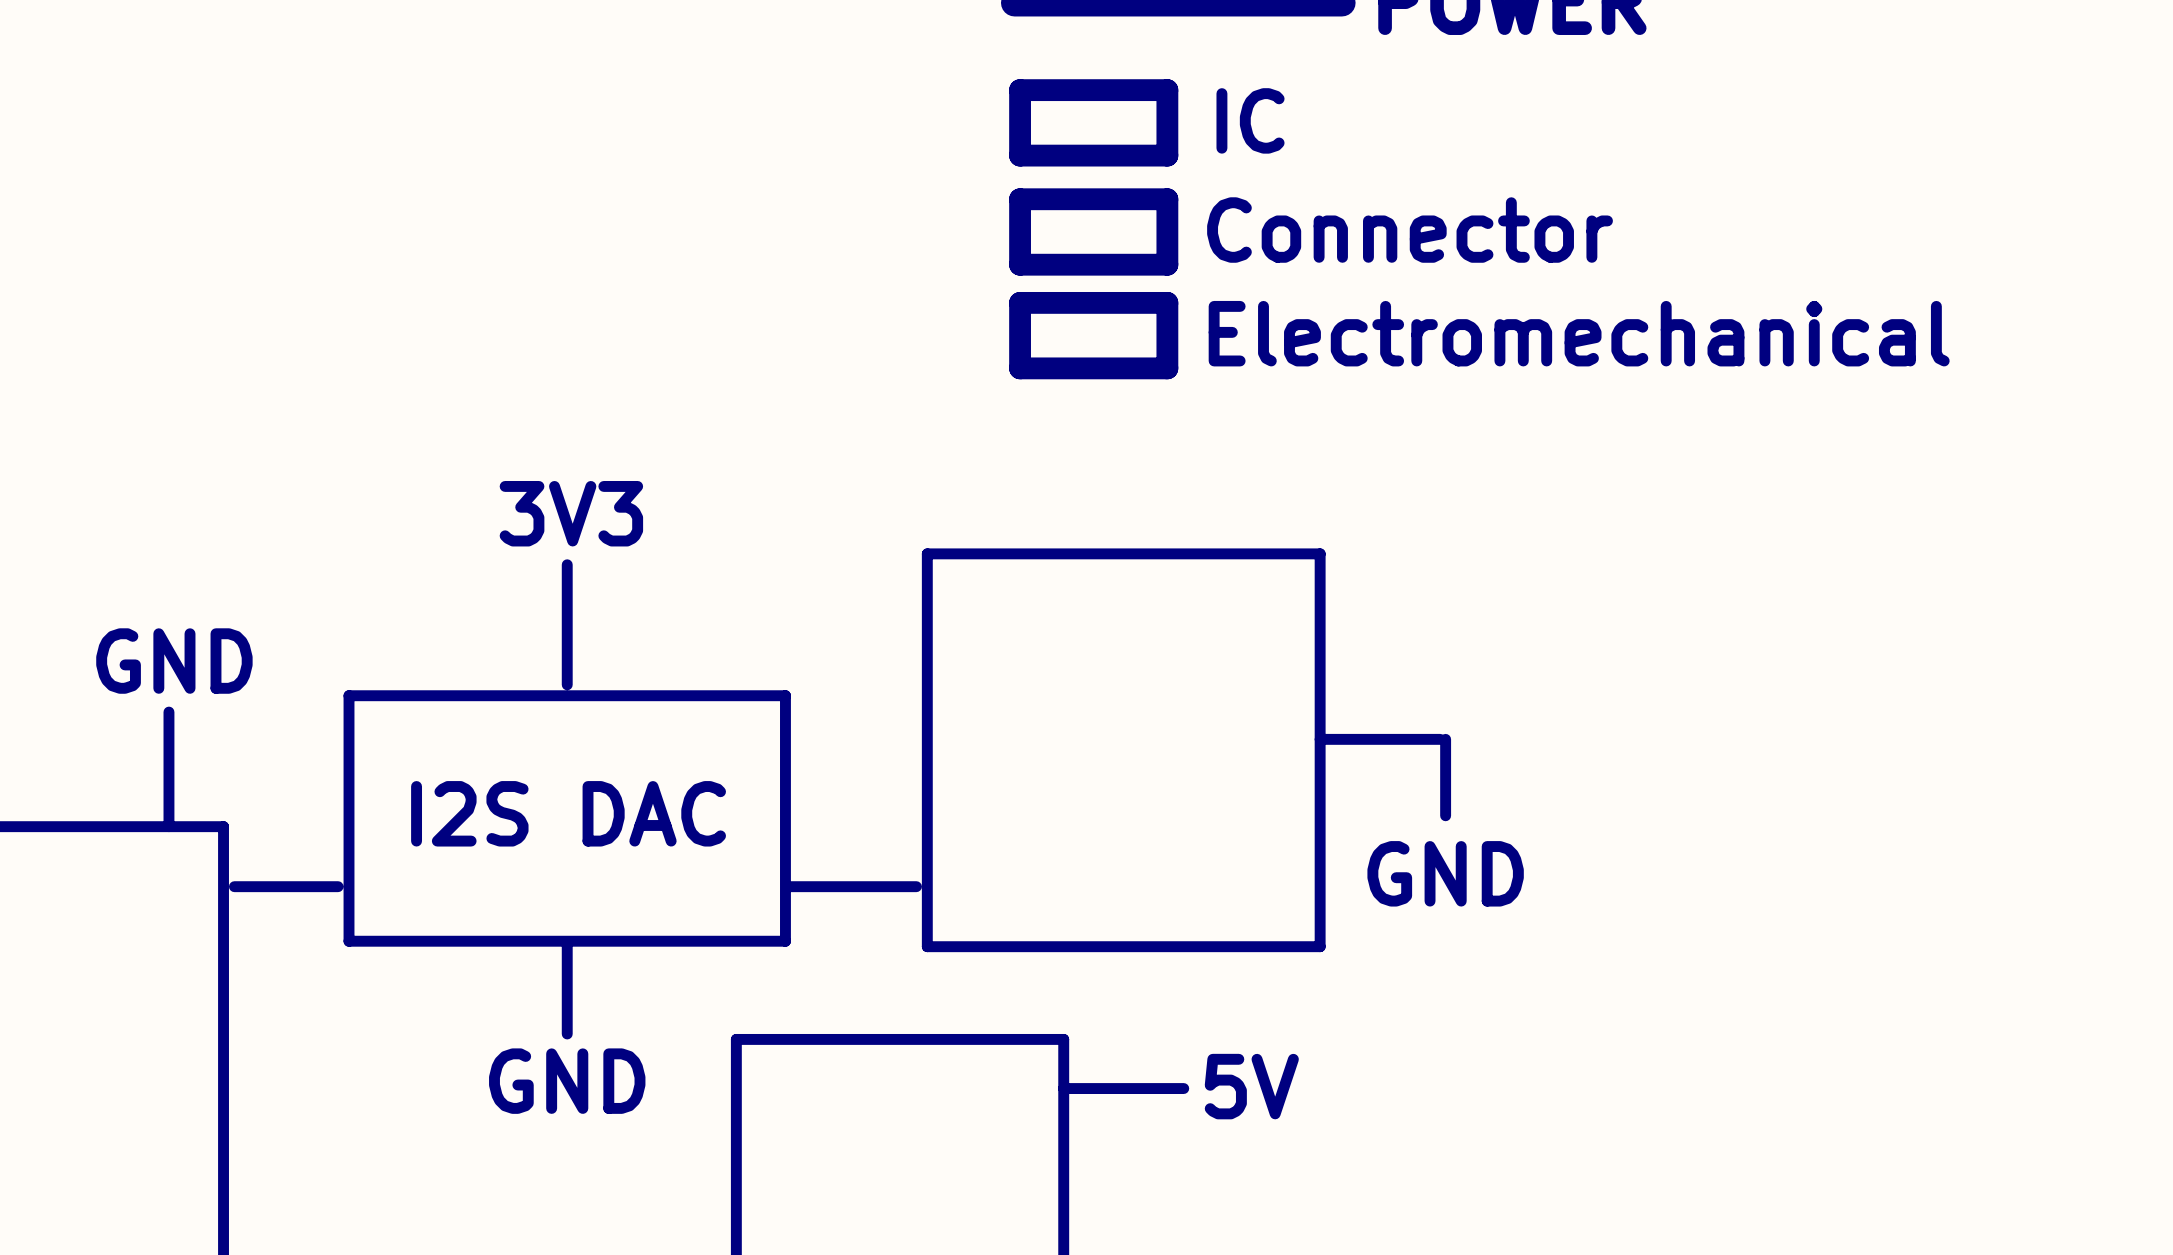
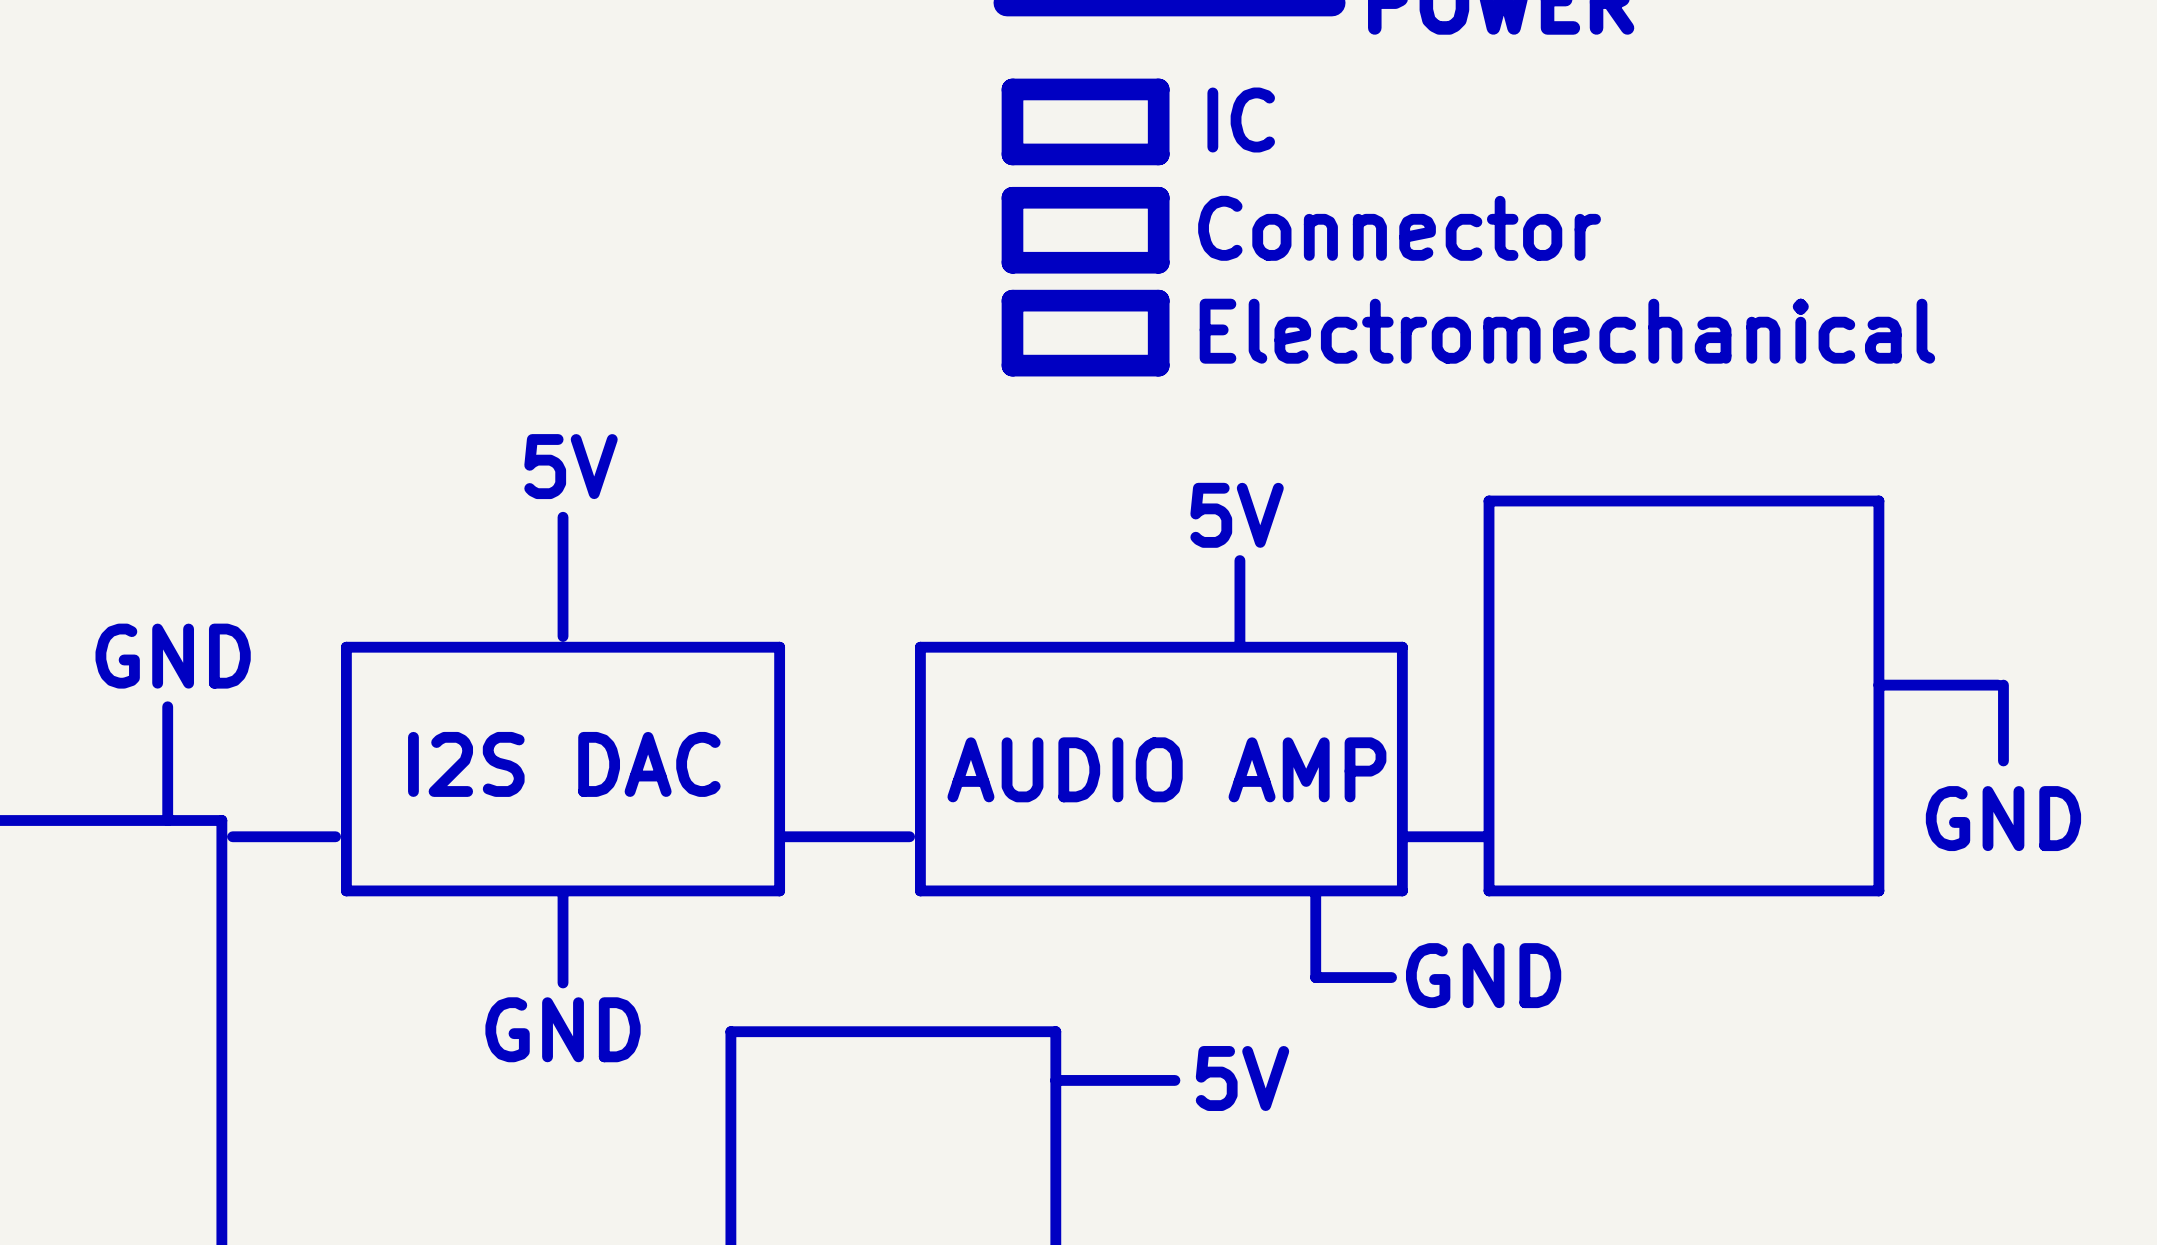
text: none -> 5V (571, 466)
line: none -> (1489, 501) (1878, 501) (1878, 890) (1489, 890) (1489, 501)
text: 3V3 (571, 513) -> none
text: none -> 5V (1237, 515)
line: none -> (1239, 560) (1239, 641)
line: (567, 641) (567, 684) -> (563, 517) (563, 560)
line: (927, 652) (927, 553) (1320, 553) (1320, 946) (927, 946) (927, 897) -> (920, 647) (1402, 647) (1402, 890) (920, 890)
line: none -> (1878, 685) (1998, 685)
line: none -> (2003, 685) (2003, 760)
line: (349, 695) (785, 695) -> (346, 690) (346, 647) (779, 647) (779, 690)
line: (1320, 739) (1440, 739) -> none
line: (1445, 739) (1445, 815) -> none
text: none -> AUDIO AMP (1166, 769)
text position: I2S DAC (568, 813) -> I2S DAC (564, 764)
text: none -> GND (2003, 818)
line: none -> (1407, 836) (1483, 836)
text position: GND (1445, 873) -> GND (1483, 975)
line: (234, 886) (338, 886) -> (232, 836) (335, 836)
line: (790, 886) (916, 886) -> (785, 836) (909, 836)
line: (349, 897) (349, 941) (785, 941) (785, 897) -> (346, 890) (779, 890)
line: none -> (1315, 896) (1315, 977) (1391, 977)
line: (567, 990) (567, 1033) -> (563, 896) (563, 939)
text position: GND (567, 1081) -> GND (563, 1029)

